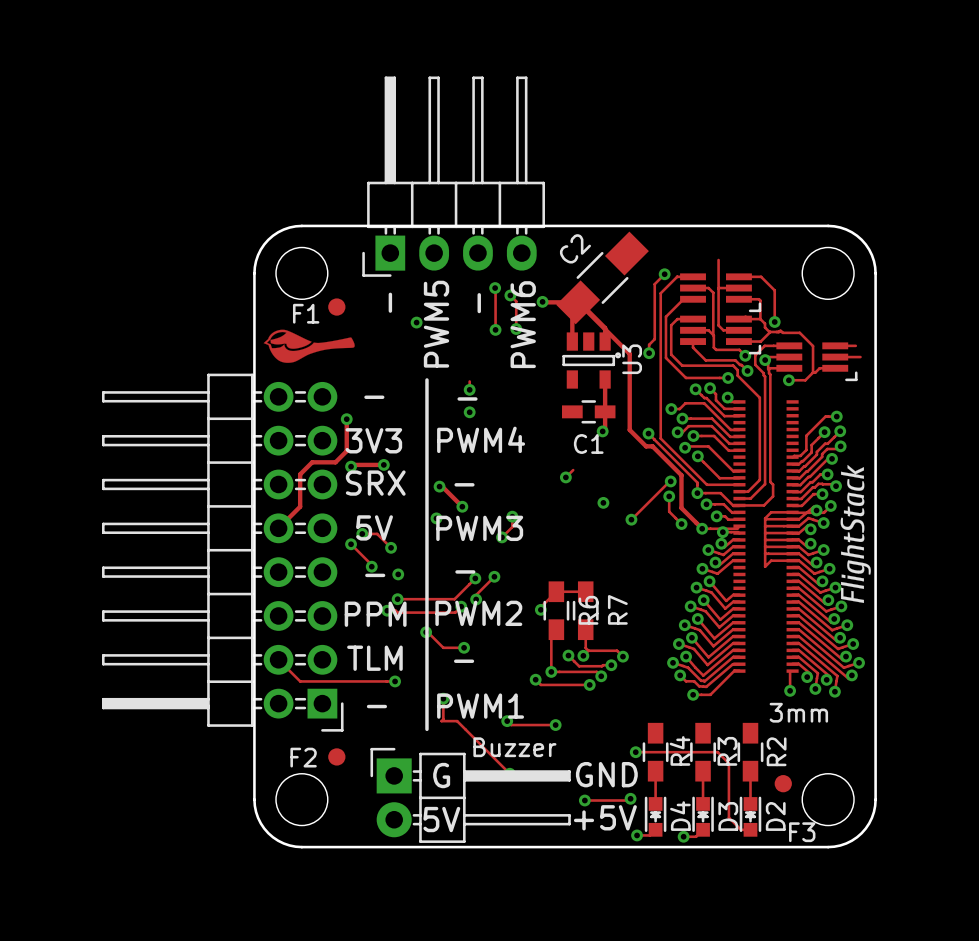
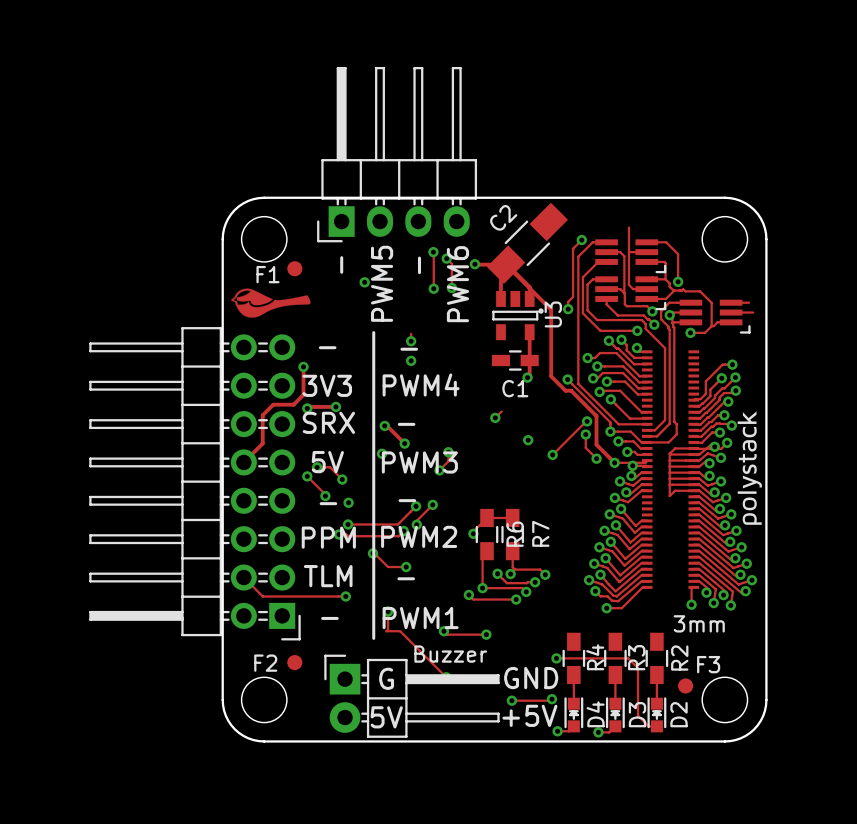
drawing shape: [840, 464, 871, 604] -> [737, 411, 762, 525]
F3 name position: F3 (802, 832) -> F3 (708, 664)

